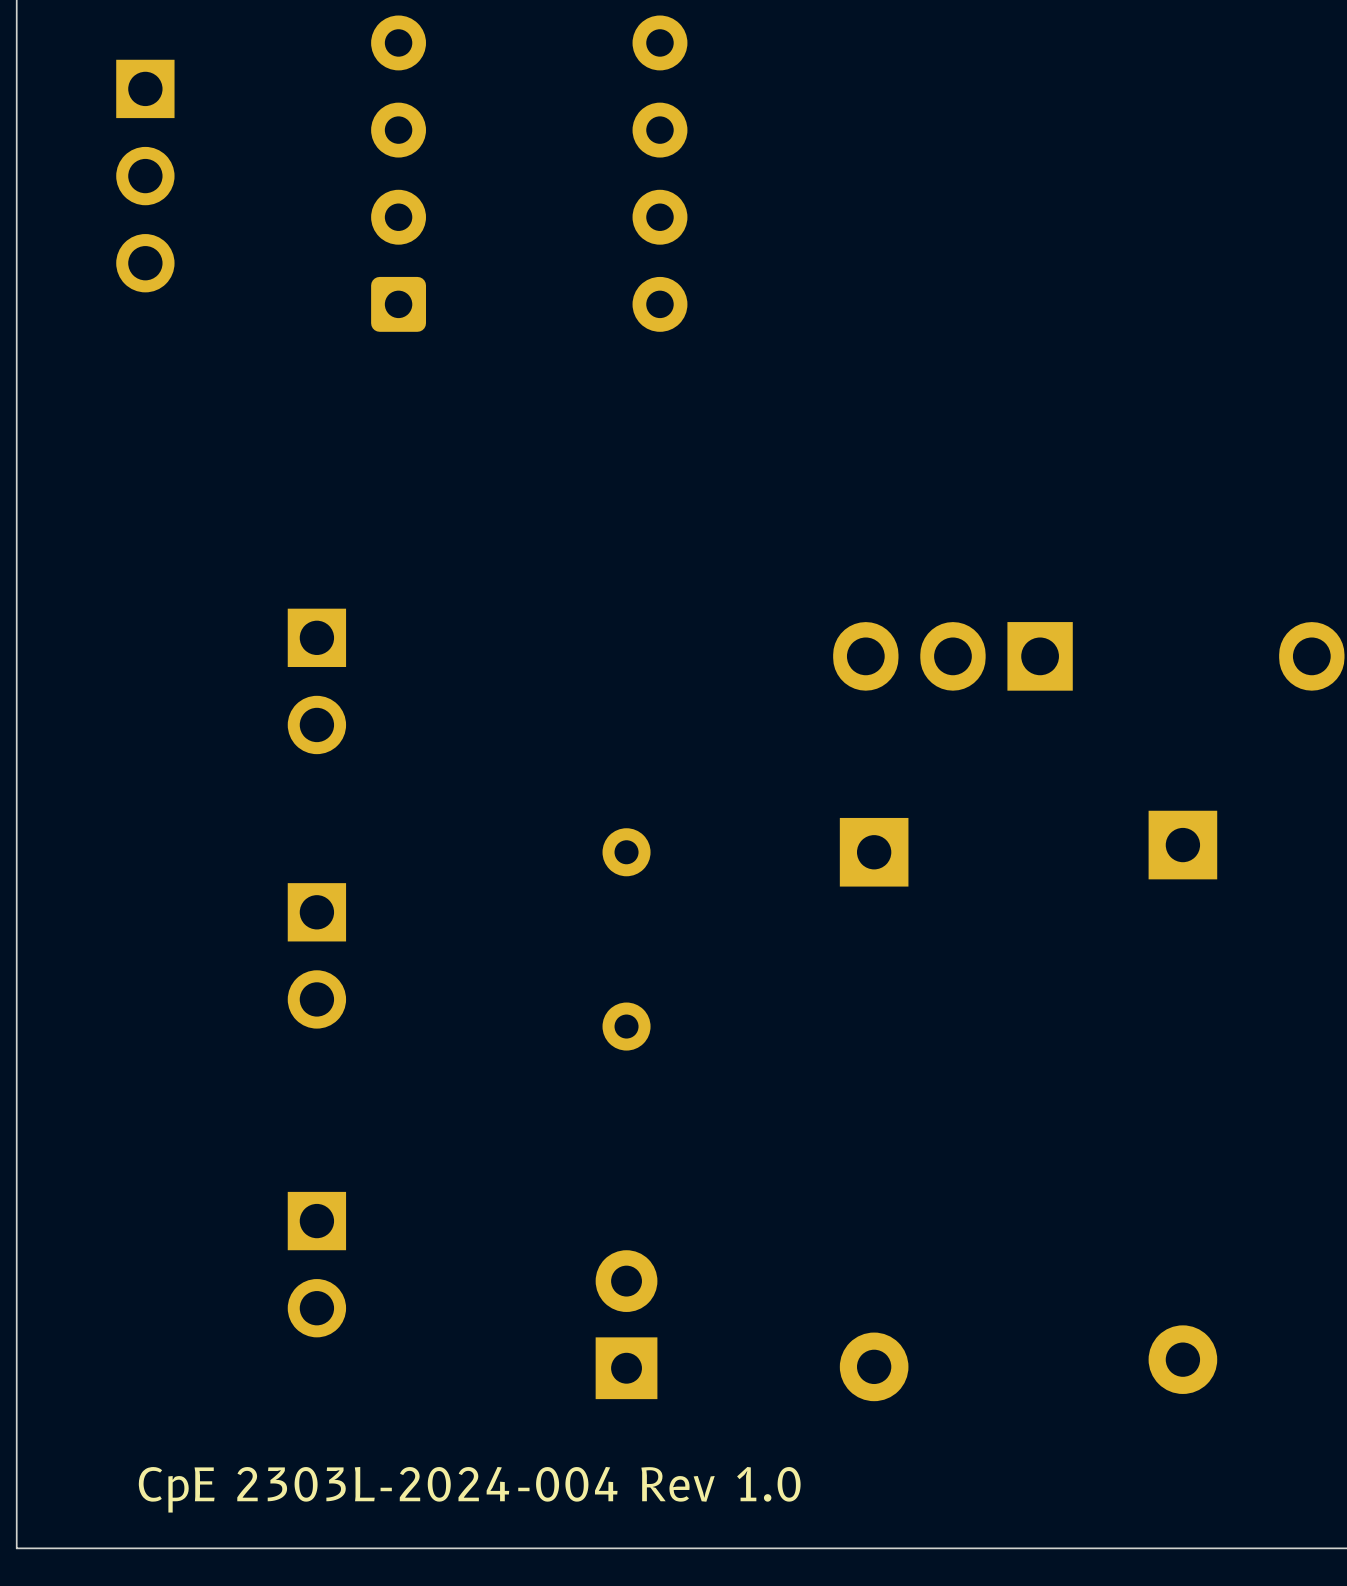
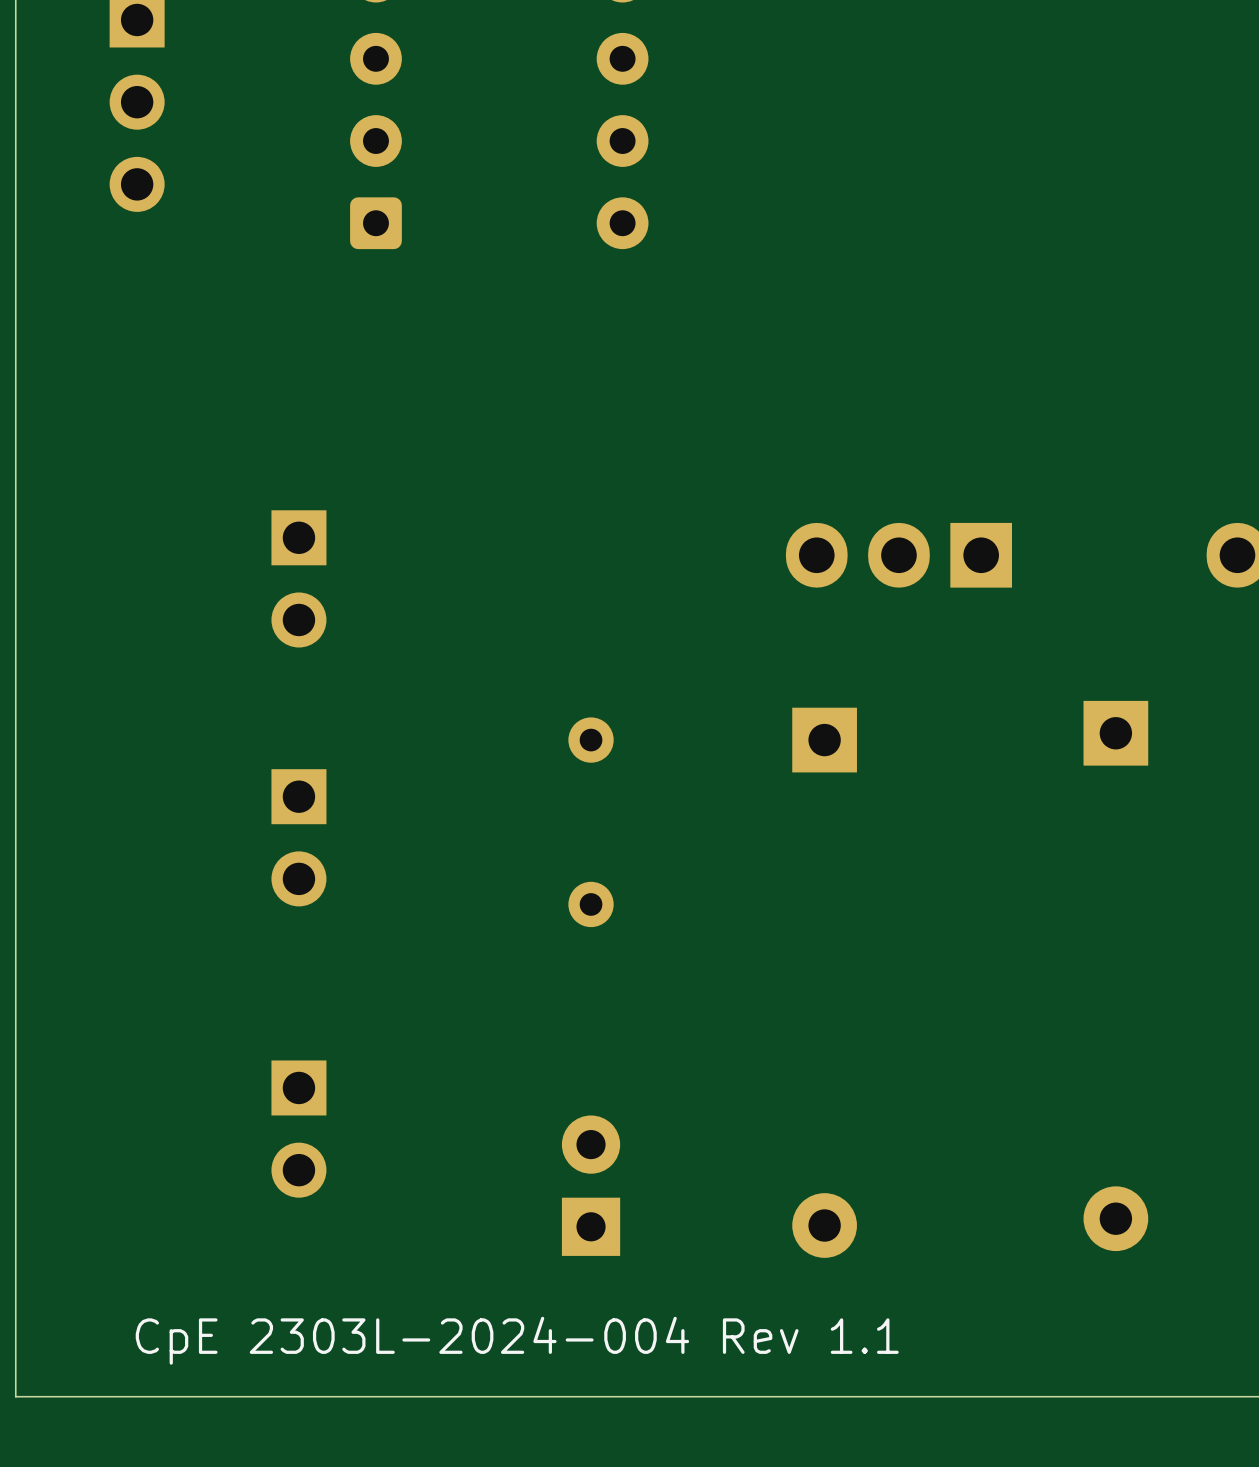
text: CpE 2303L-2024-004 Rev 1.0 (469, 1489) -> CpE 2303L-2024-004 Rev 1.1 (517, 1340)

